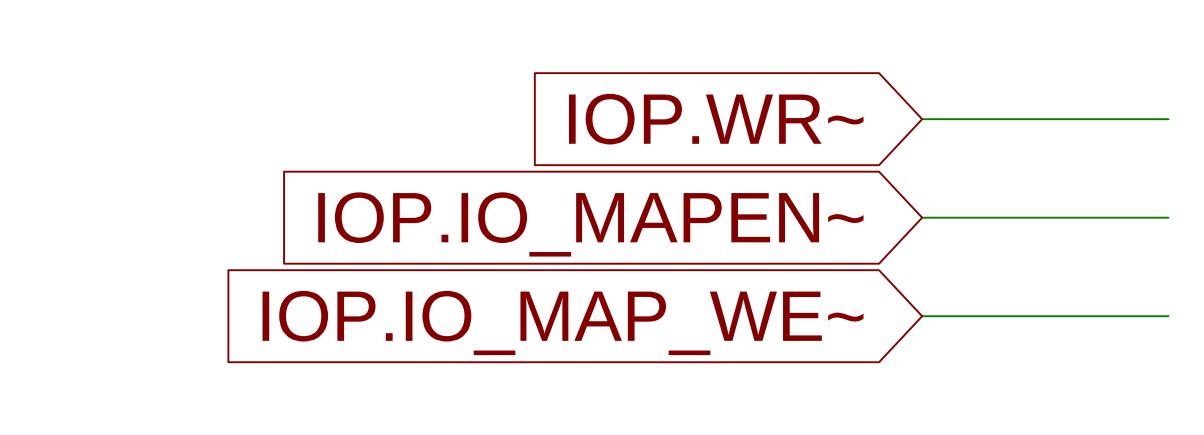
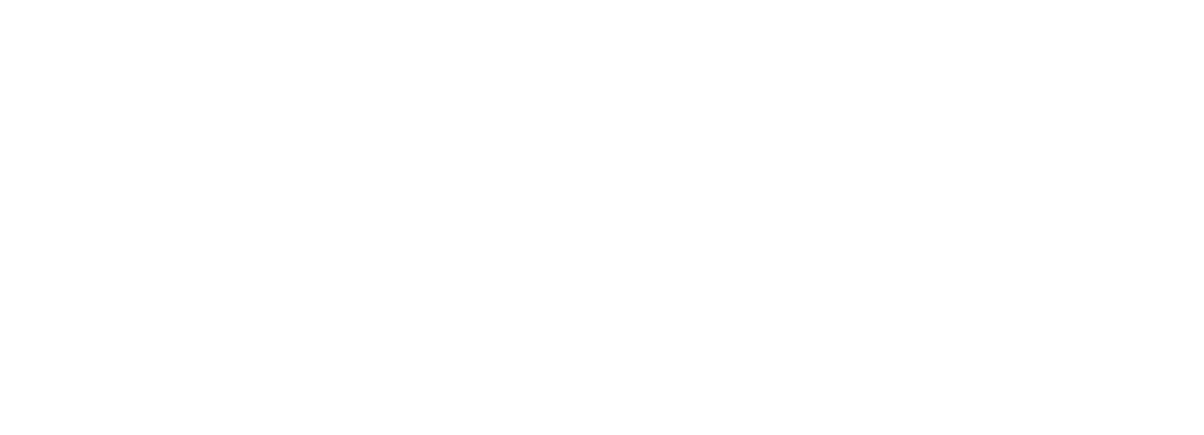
global label: IOP.WR~ (716, 119) -> none
wire: (922, 119) (1168, 119) -> none
wire: (922, 217) (1168, 217) -> none
global label: IOP.IO_MAPEN~ (590, 224) -> none
wire: (922, 316) (1168, 316) -> none
global label: IOP.IO_MAP_WE~ (563, 322) -> none

